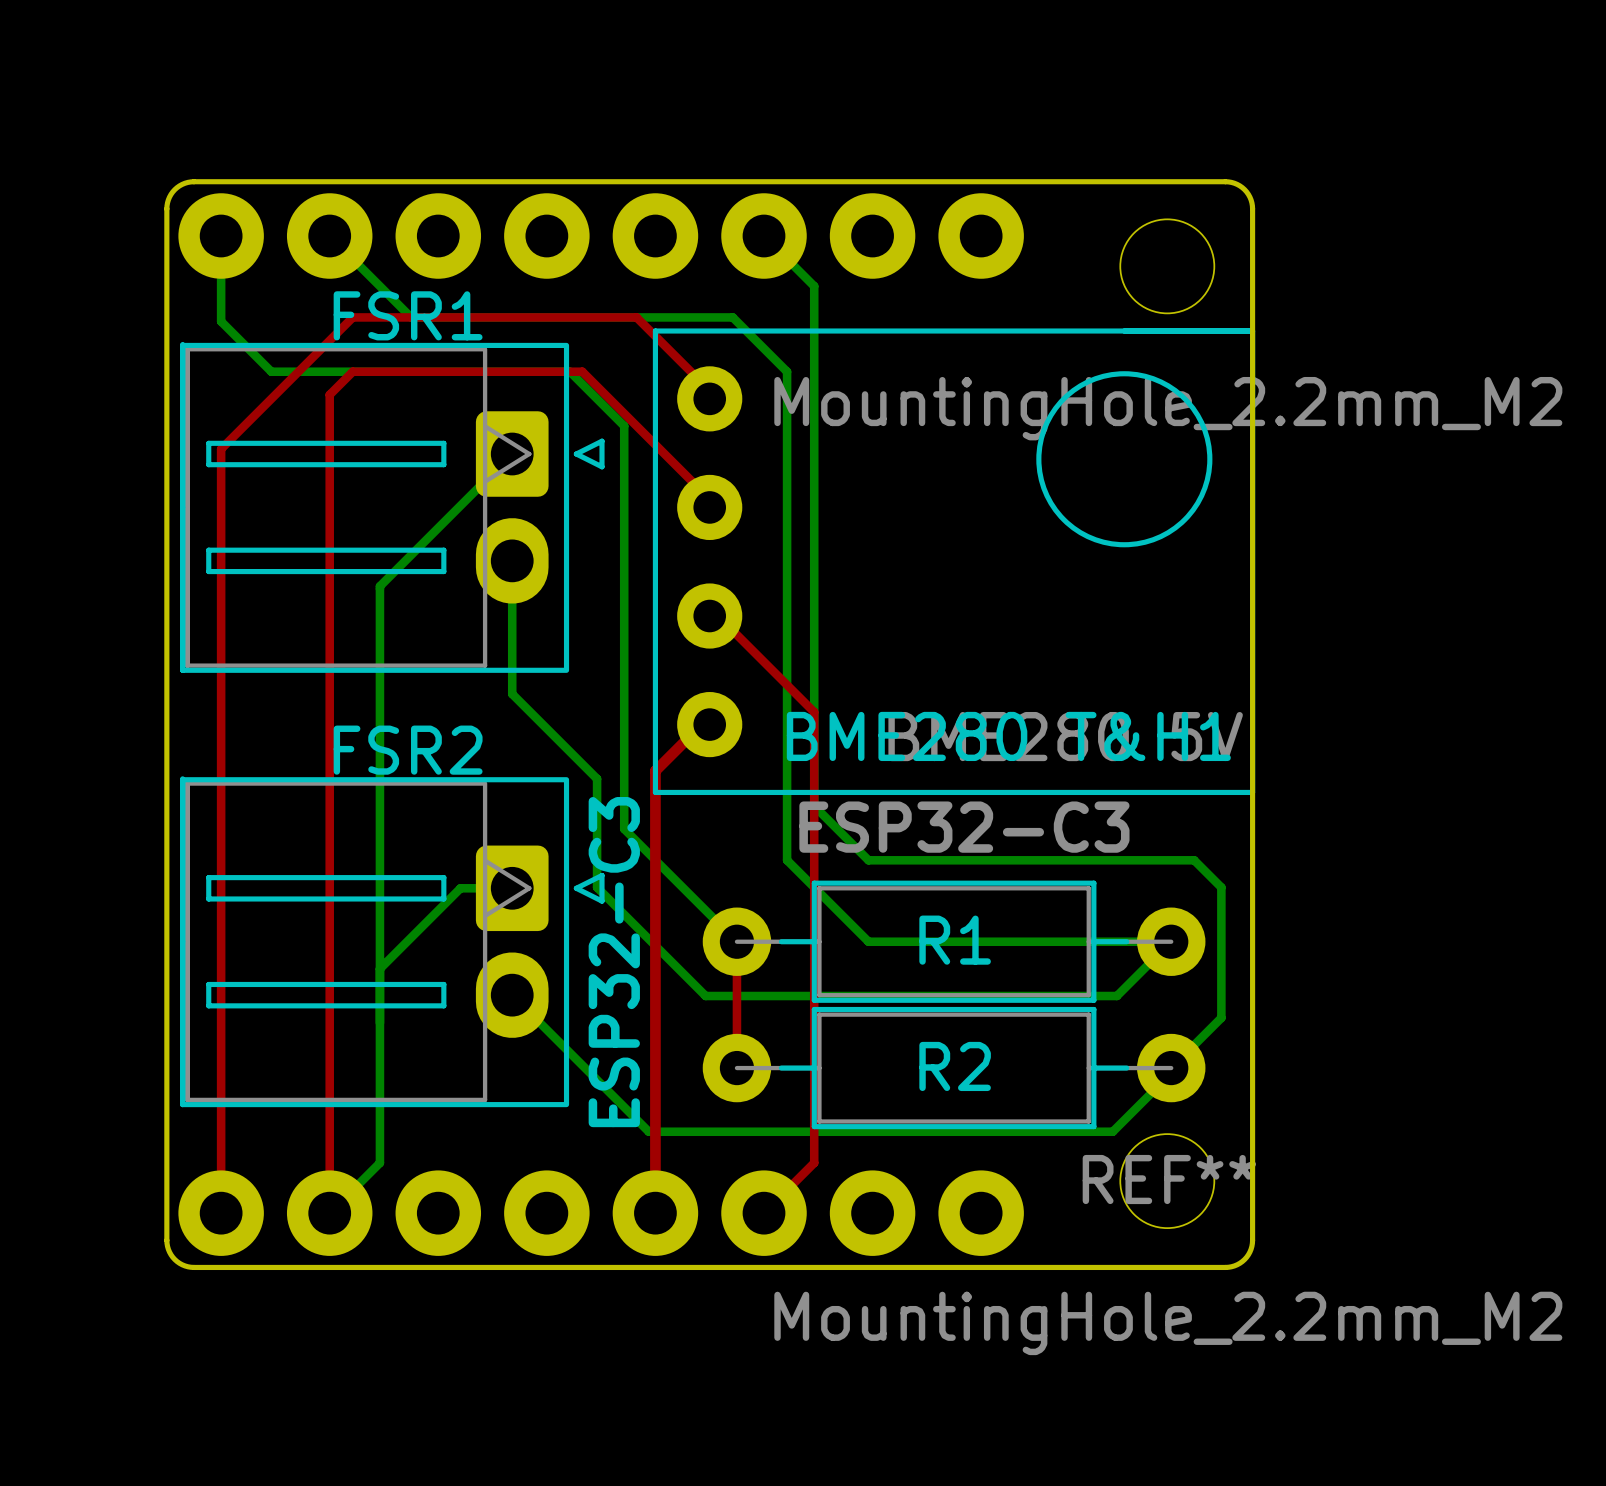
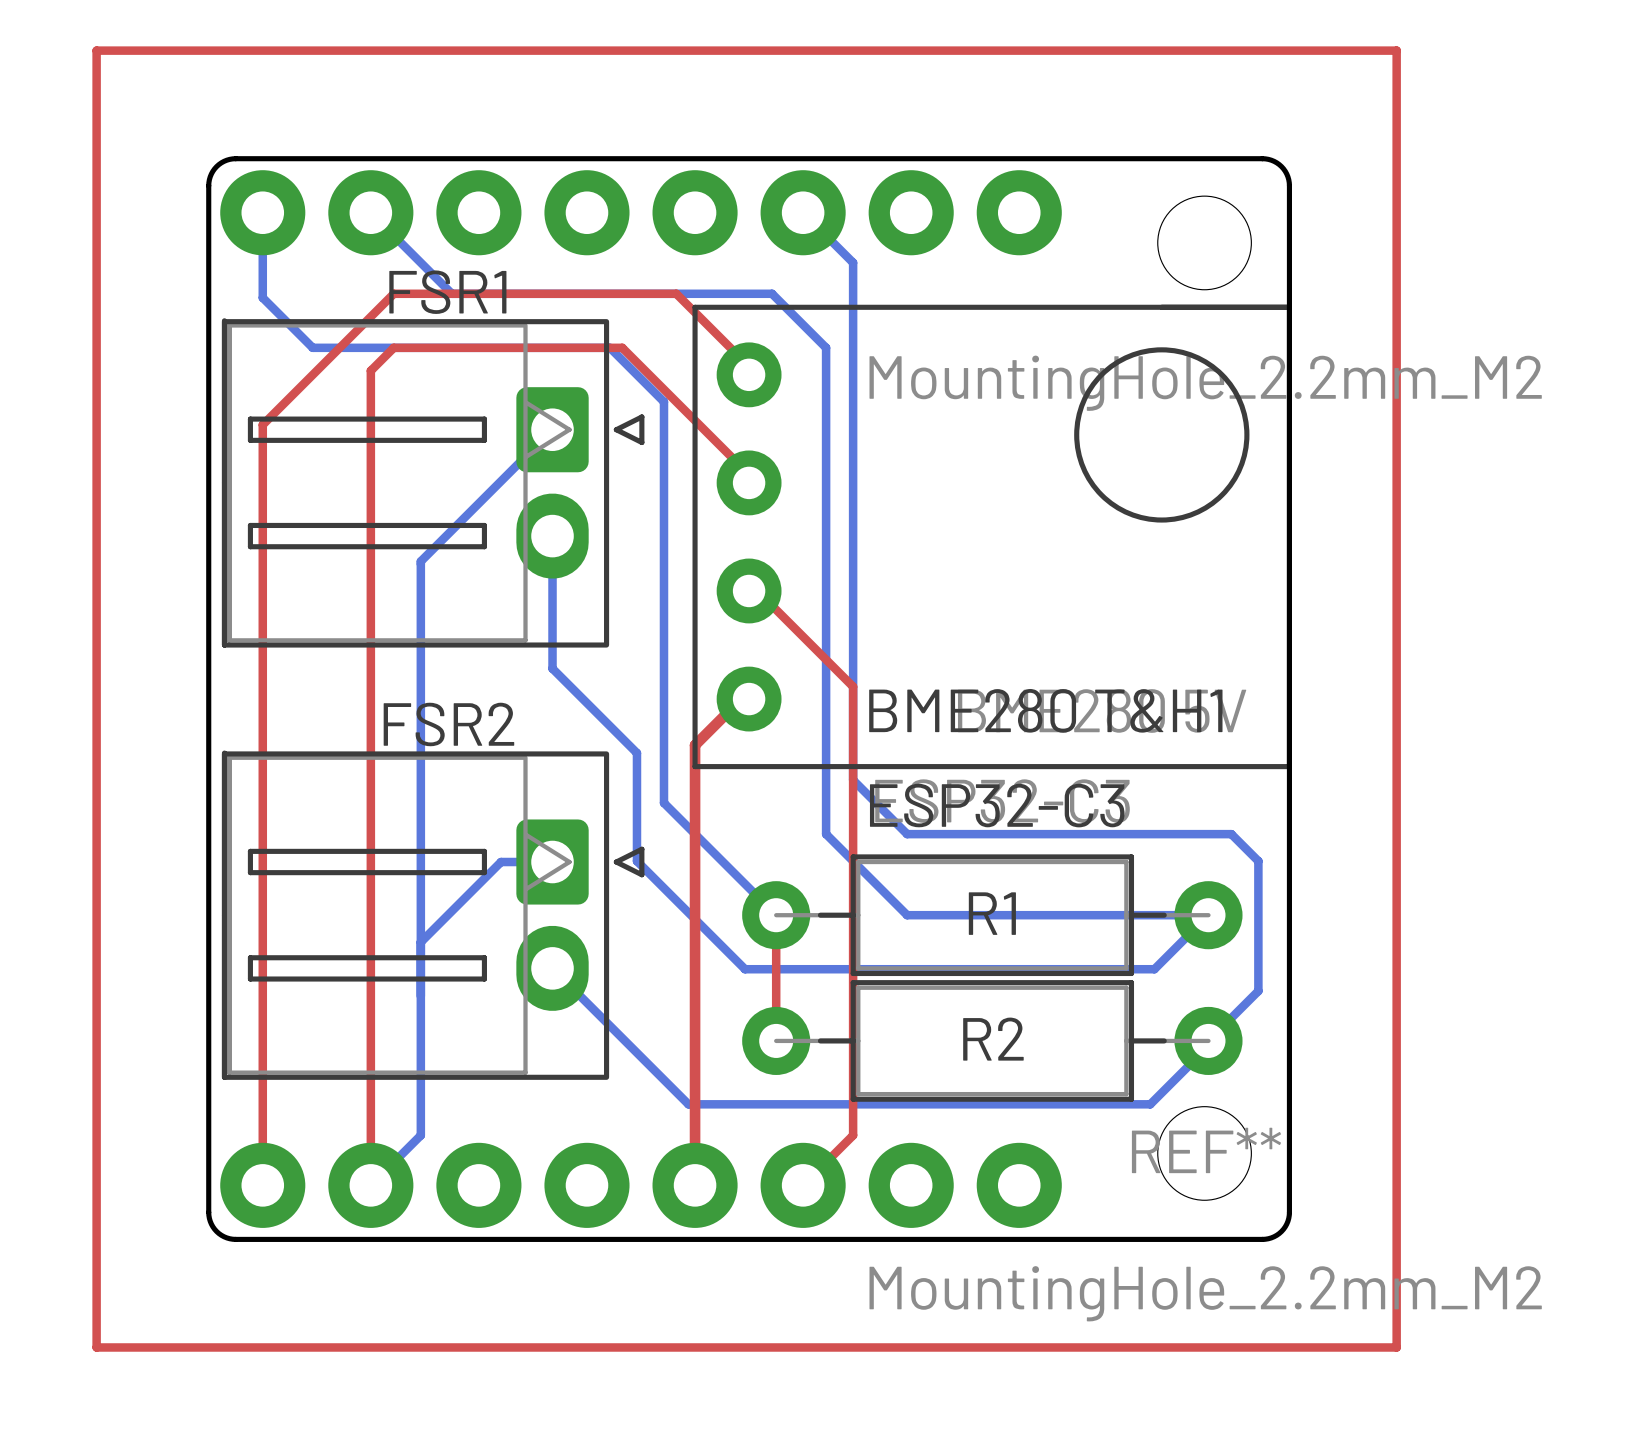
top track: none -> (96, 50) (1396, 50) (1396, 1347) (96, 1347) (96, 50)
ESP32-C3 name rotation: 0° (614, 962) -> 90° clockwise (997, 805)

